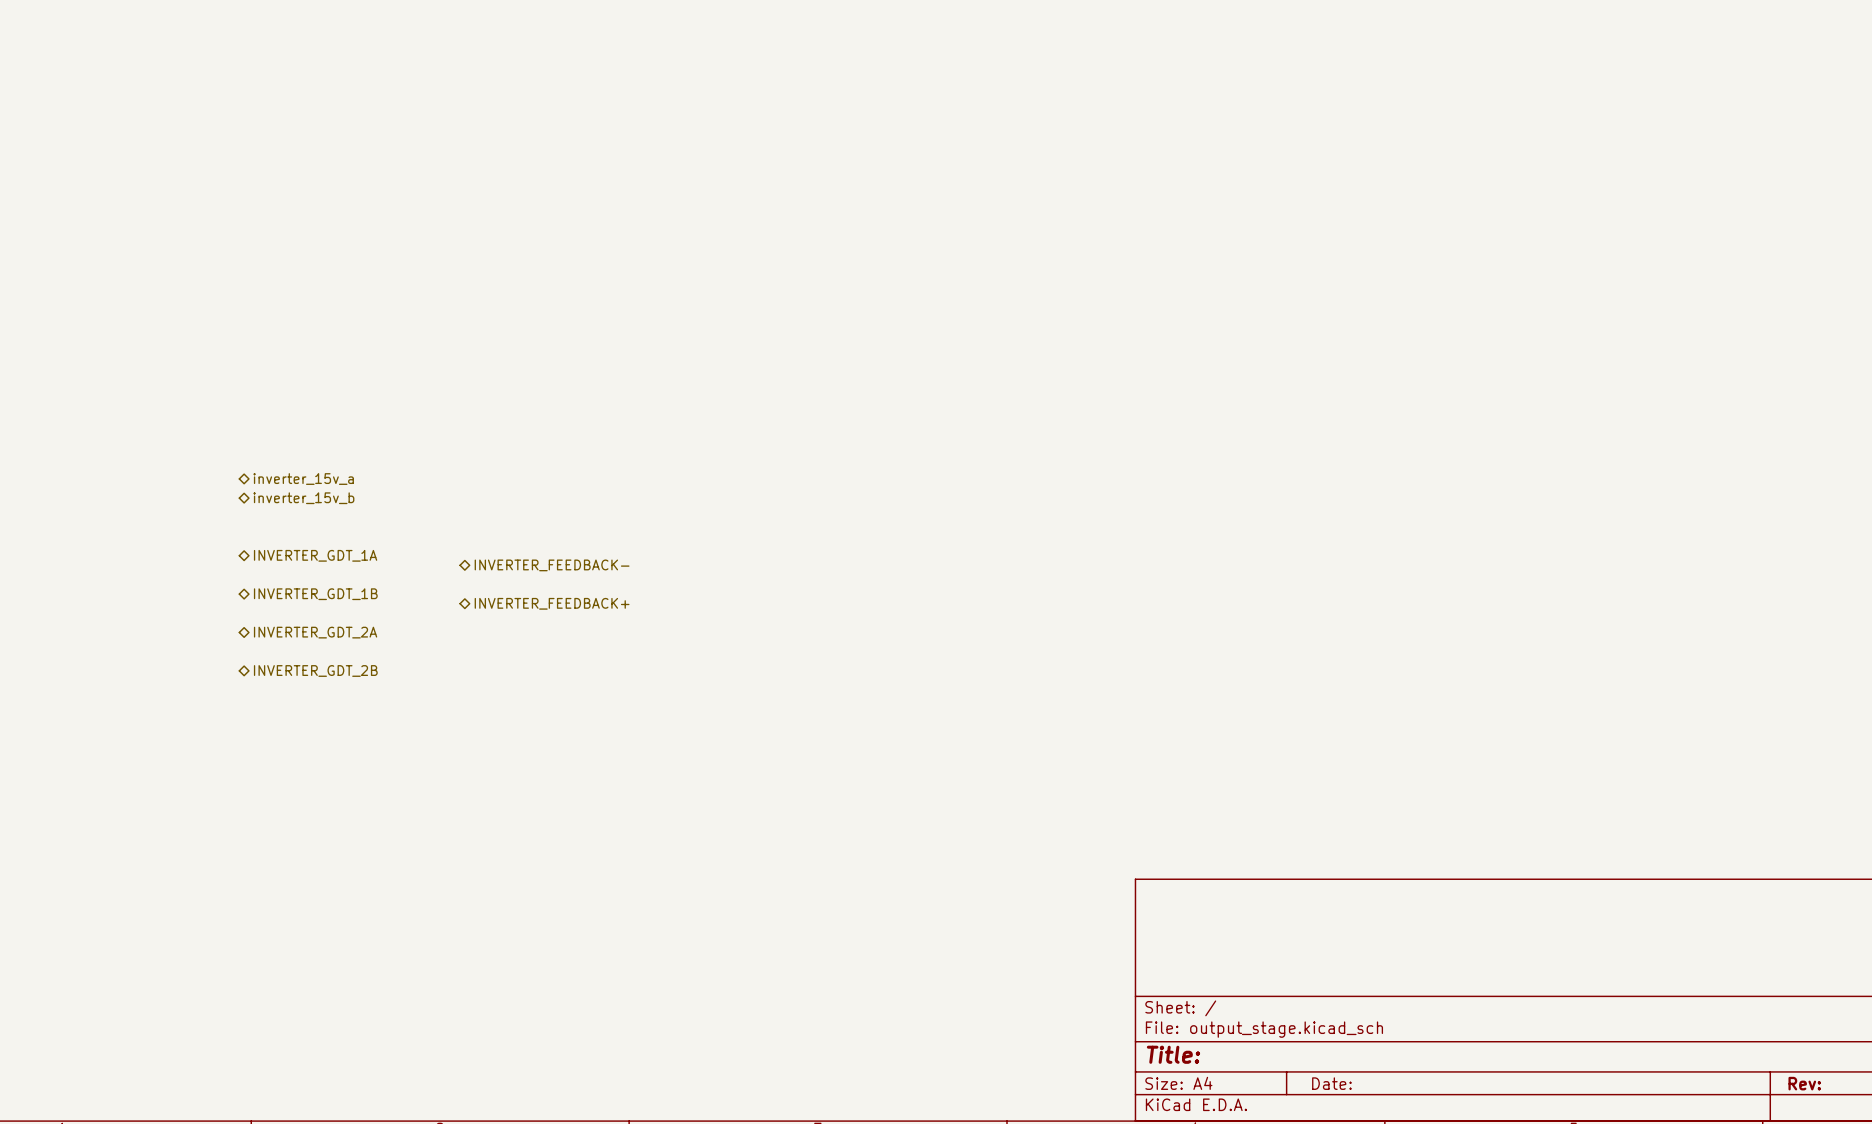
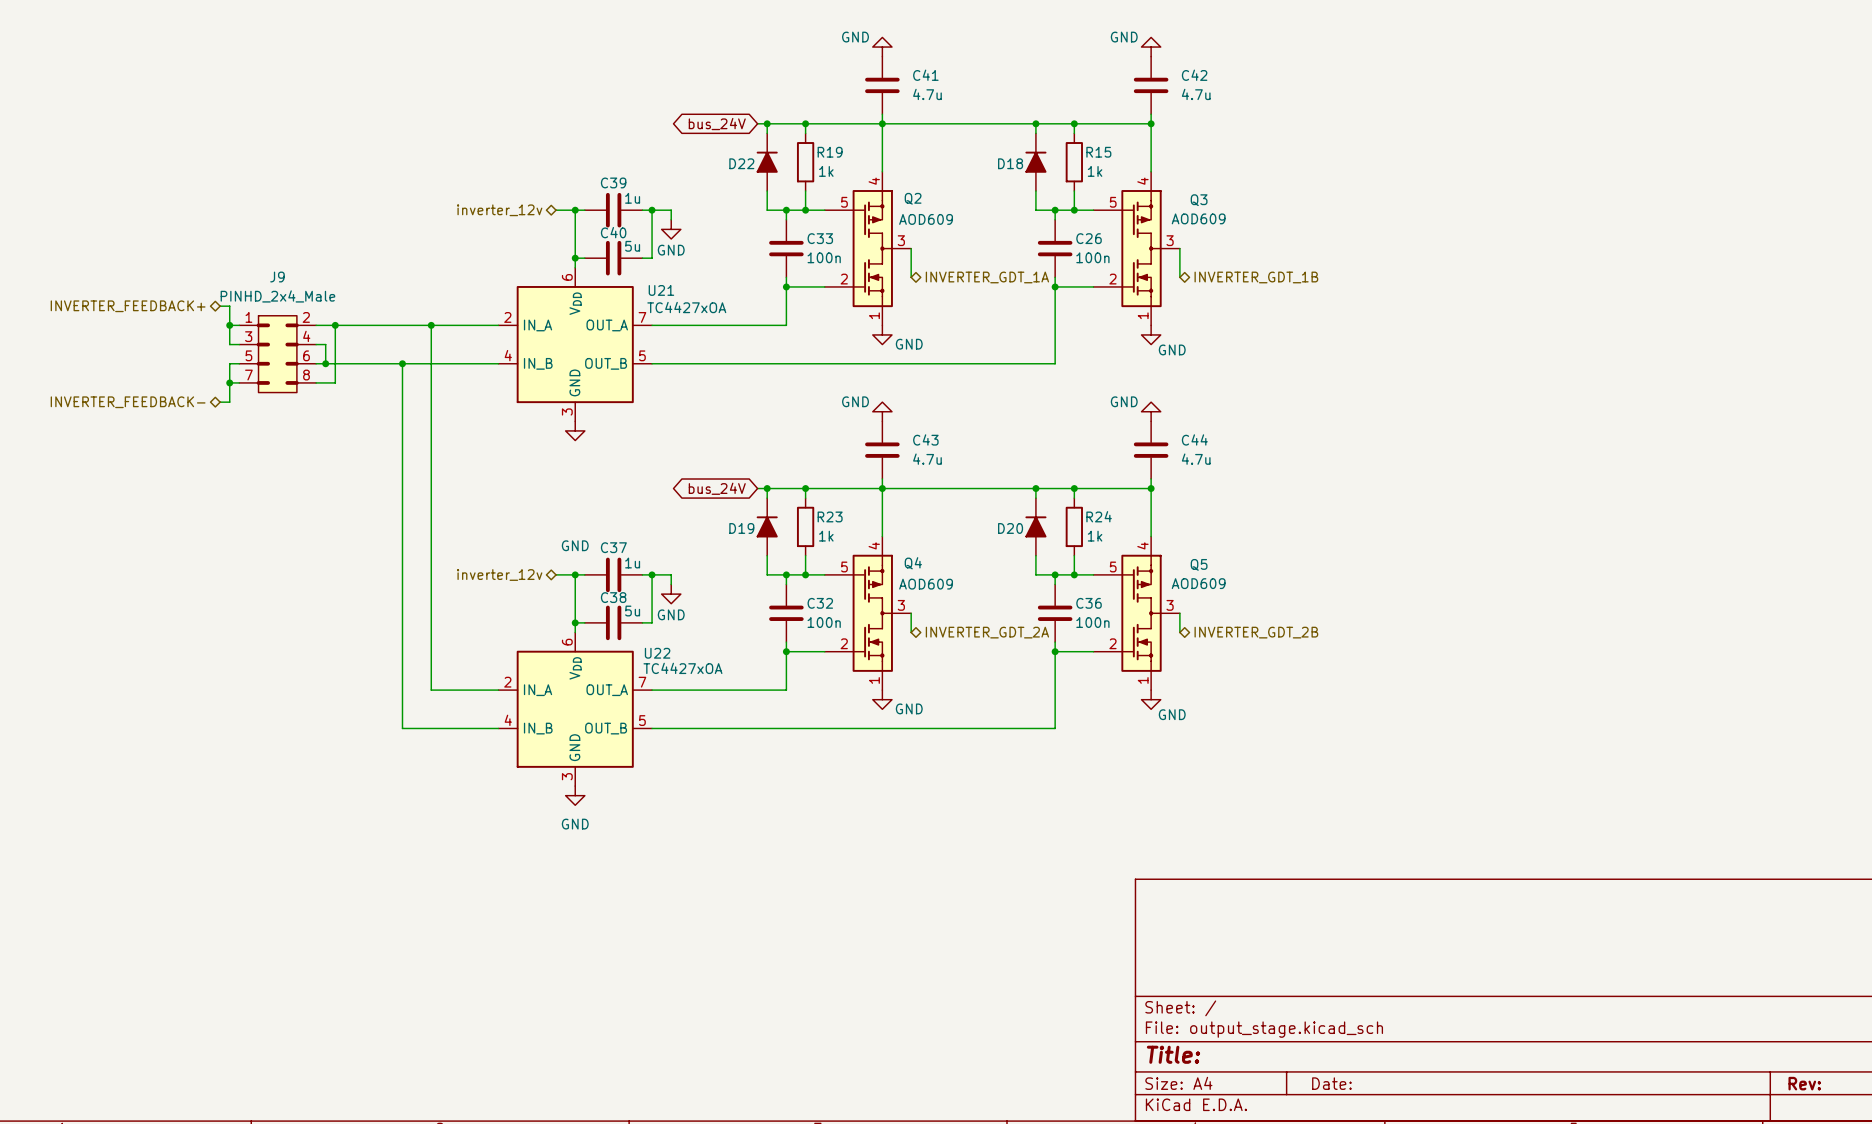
power symbol: none -> GND (882, 47)
power symbol: none -> GND (1151, 47)
C41: none -> 4.7u (882, 85)
C42: none -> 4.7u (1151, 85)
wire: none -> (882, 114) (882, 171)
wire: none -> (1151, 114) (1151, 171)
wire: none -> (757, 123) (1151, 123)
wire: none -> (767, 123) (767, 133)
junction: none -> (767, 123)
wire: none -> (805, 123) (805, 133)
junction: none -> (805, 123)
junction: none -> (882, 123)
wire: none -> (1035, 123) (1035, 133)
junction: none -> (1035, 123)
wire: none -> (1074, 123) (1074, 133)
junction: none -> (1074, 123)
junction: none -> (1151, 123)
global label: none -> bus_24V (717, 124)
D22: none -> (767, 162)
R19: none -> 1k (805, 162)
D18: none -> (1035, 162)
R15: none -> 1k (1074, 162)
wire: none -> (767, 191) (767, 210) (824, 210)
wire: none -> (805, 191) (805, 210)
wire: none -> (1035, 191) (1035, 210) (1093, 210)
wire: none -> (1074, 191) (1074, 210)
hierarchical label: none -> inverter_12v (499, 210)
wire: none -> (556, 210) (584, 210)
wire: none -> (575, 210) (575, 267)
junction: none -> (575, 210)
C39: none -> 1u (613, 210)
wire: none -> (642, 210) (671, 210) (671, 219)
wire: none -> (652, 210) (652, 258) (642, 258)
junction: none -> (652, 210)
wire: none -> (786, 210) (786, 219)
junction: none -> (786, 210)
junction: none -> (805, 210)
wire: none -> (1055, 210) (1055, 219)
junction: none -> (1055, 210)
junction: none -> (1074, 210)
power symbol: none -> GND (671, 229)
C33: none -> 100n (786, 248)
Q2: none -> AOD609 (867, 248)
wire: none -> (911, 248) (911, 277)
C26: none -> 100n (1055, 248)
Q3: none -> AOD609 (1136, 248)
wire: none -> (1179, 248) (1179, 277)
wire: none -> (575, 258) (584, 258)
junction: none -> (575, 258)
C40: none -> 5u (613, 258)
wire: none -> (786, 277) (786, 325) (652, 325)
hierarchical label: none -> INVERTER_GDT_1A (987, 277)
wire: none -> (1055, 277) (1055, 363) (652, 363)
hierarchical label: none -> INVERTER_GDT_1B (1256, 277)
wire: none -> (786, 286) (824, 286)
junction: none -> (786, 286)
wire: none -> (1055, 286) (1093, 286)
junction: none -> (1055, 286)
hierarchical label: none -> INVERTER_FEEDBACK+ (128, 306)
wire: none -> (220, 306) (229, 306) (229, 344) (239, 344)
wire: none -> (229, 325) (239, 325)
junction: none -> (229, 325)
wire: none -> (316, 325) (498, 325)
wire: none -> (335, 325) (335, 382) (316, 382)
junction: none -> (335, 325)
wire: none -> (431, 325) (431, 690) (498, 690)
junction: none -> (431, 325)
power symbol: none -> GND (882, 334)
power symbol: none -> GND (1151, 334)
wire: none -> (316, 344) (325, 344) (325, 363)
U21: none -> TC4427xOA (575, 344)
J9: none -> PINHD_2x4_Male (277, 354)
wire: none -> (239, 363) (229, 363) (229, 402) (220, 402)
wire: none -> (316, 363) (498, 363)
junction: none -> (325, 363)
wire: none -> (402, 363) (402, 728) (498, 728)
junction: none -> (402, 363)
wire: none -> (229, 382) (239, 382)
junction: none -> (229, 382)
hierarchical label: none -> INVERTER_FEEDBACK- (128, 402)
power symbol: none -> GND (882, 411)
power symbol: none -> GND (1151, 411)
power symbol: none -> GND (575, 430)
C43: none -> 4.7u (882, 450)
C44: none -> 4.7u (1151, 450)
wire: none -> (882, 478) (882, 536)
wire: none -> (1151, 478) (1151, 536)
hierarchical label: inverter_15v_a (303, 479) -> none
global label: none -> bus_24V (717, 488)
wire: none -> (757, 488) (1151, 488)
wire: none -> (767, 488) (767, 498)
junction: none -> (767, 488)
wire: none -> (805, 488) (805, 498)
junction: none -> (805, 488)
junction: none -> (882, 488)
wire: none -> (1035, 488) (1035, 498)
junction: none -> (1035, 488)
wire: none -> (1074, 488) (1074, 498)
junction: none -> (1074, 488)
junction: none -> (1151, 488)
hierarchical label: inverter_15v_b (303, 498) -> none
D19: none -> (767, 526)
R23: none -> 1k (805, 526)
D20: none -> (1035, 526)
R24: none -> 1k (1074, 526)
hierarchical label: INVERTER_GDT_1A (315, 555) -> none
wire: none -> (767, 555) (767, 574) (824, 574)
wire: none -> (805, 555) (805, 574)
wire: none -> (1035, 555) (1035, 574) (1093, 574)
wire: none -> (1074, 555) (1074, 574)
hierarchical label: INVERTER_FEEDBACK- (552, 565) -> none
wire: none -> (556, 574) (584, 574)
wire: none -> (575, 574) (575, 632)
junction: none -> (575, 574)
C37: none -> 1u (613, 574)
wire: none -> (642, 574) (671, 574) (671, 584)
wire: none -> (652, 574) (652, 622) (642, 622)
junction: none -> (652, 574)
wire: none -> (786, 574) (786, 584)
junction: none -> (786, 574)
junction: none -> (805, 574)
wire: none -> (1055, 574) (1055, 584)
junction: none -> (1055, 574)
junction: none -> (1074, 574)
hierarchical label: none -> inverter_12v (499, 575)
hierarchical label: INVERTER_GDT_1B (315, 594) -> none
power symbol: none -> GND (671, 594)
hierarchical label: INVERTER_FEEDBACK+ (552, 603) -> none
C32: none -> 100n (786, 613)
Q4: none -> AOD609 (867, 613)
wire: none -> (911, 613) (911, 632)
C36: none -> 100n (1055, 613)
Q5: none -> AOD609 (1136, 613)
wire: none -> (1179, 613) (1179, 632)
wire: none -> (575, 622) (584, 622)
junction: none -> (575, 622)
C38: none -> 5u (613, 622)
hierarchical label: INVERTER_GDT_2A (315, 632) -> none
hierarchical label: none -> INVERTER_GDT_2A (987, 632)
hierarchical label: none -> INVERTER_GDT_2B (1256, 632)
wire: none -> (786, 642) (786, 690) (652, 690)
wire: none -> (1055, 642) (1055, 728) (652, 728)
wire: none -> (786, 651) (824, 651)
junction: none -> (786, 651)
wire: none -> (1055, 651) (1093, 651)
junction: none -> (1055, 651)
hierarchical label: INVERTER_GDT_2B (315, 670) -> none
power symbol: none -> GND (882, 699)
power symbol: none -> GND (1151, 699)
U22: none -> TC4427xOA (575, 709)
power symbol: none -> GND (575, 795)

